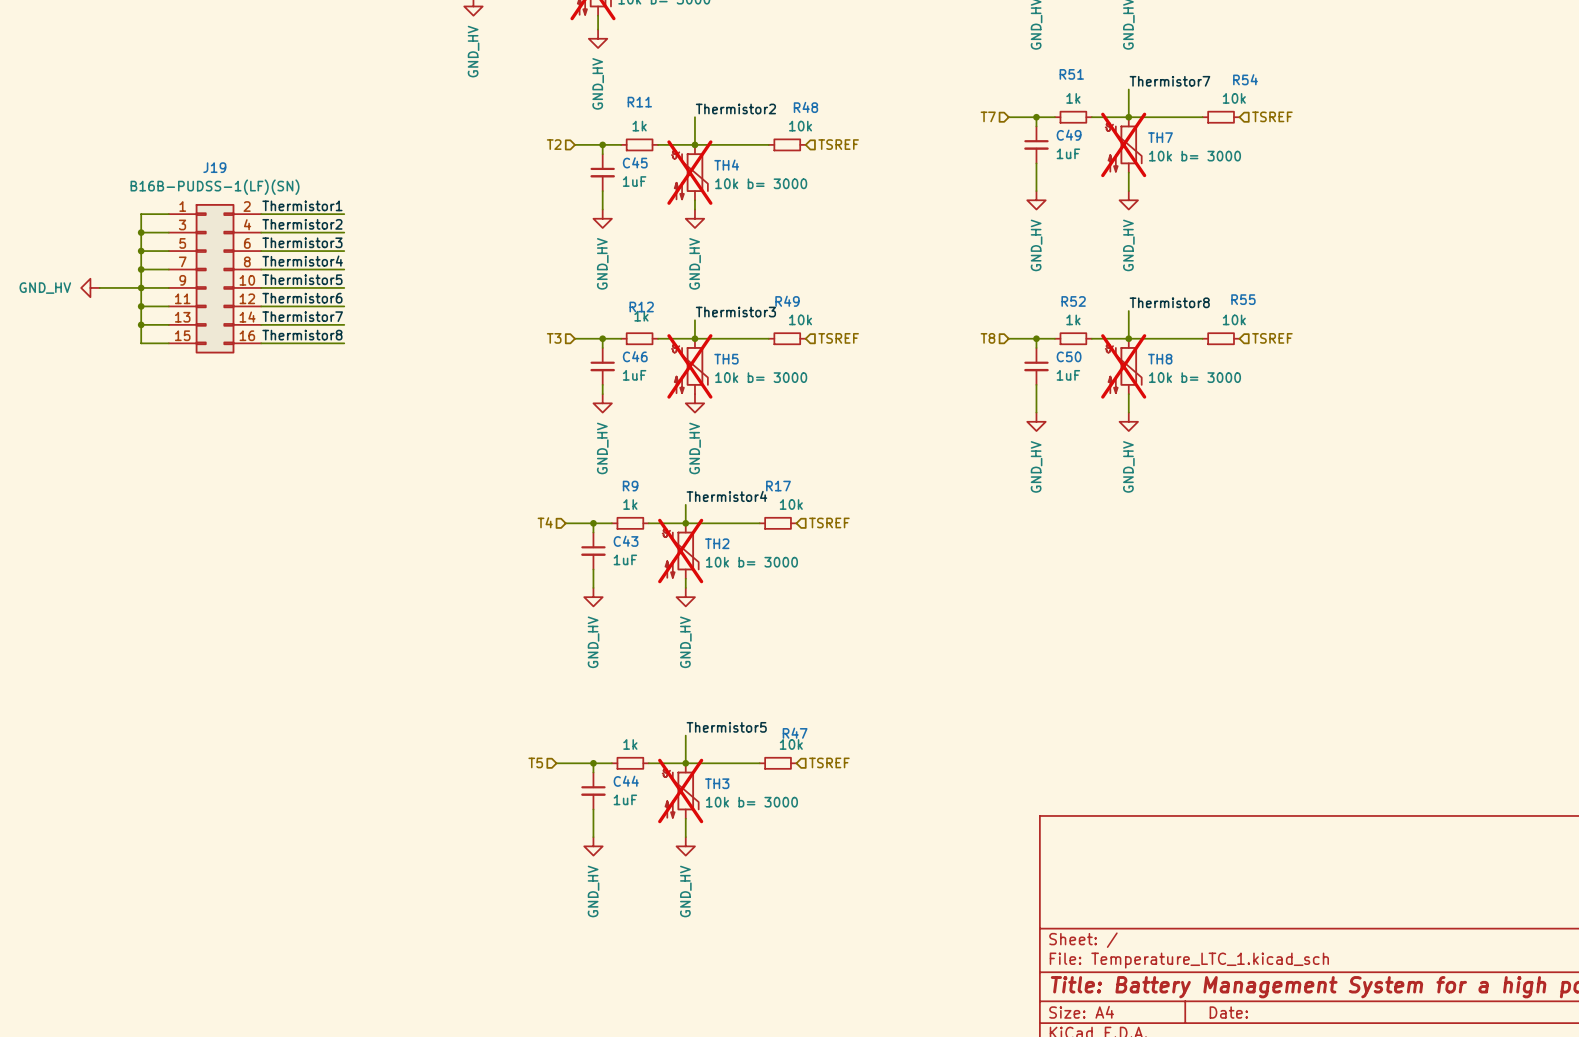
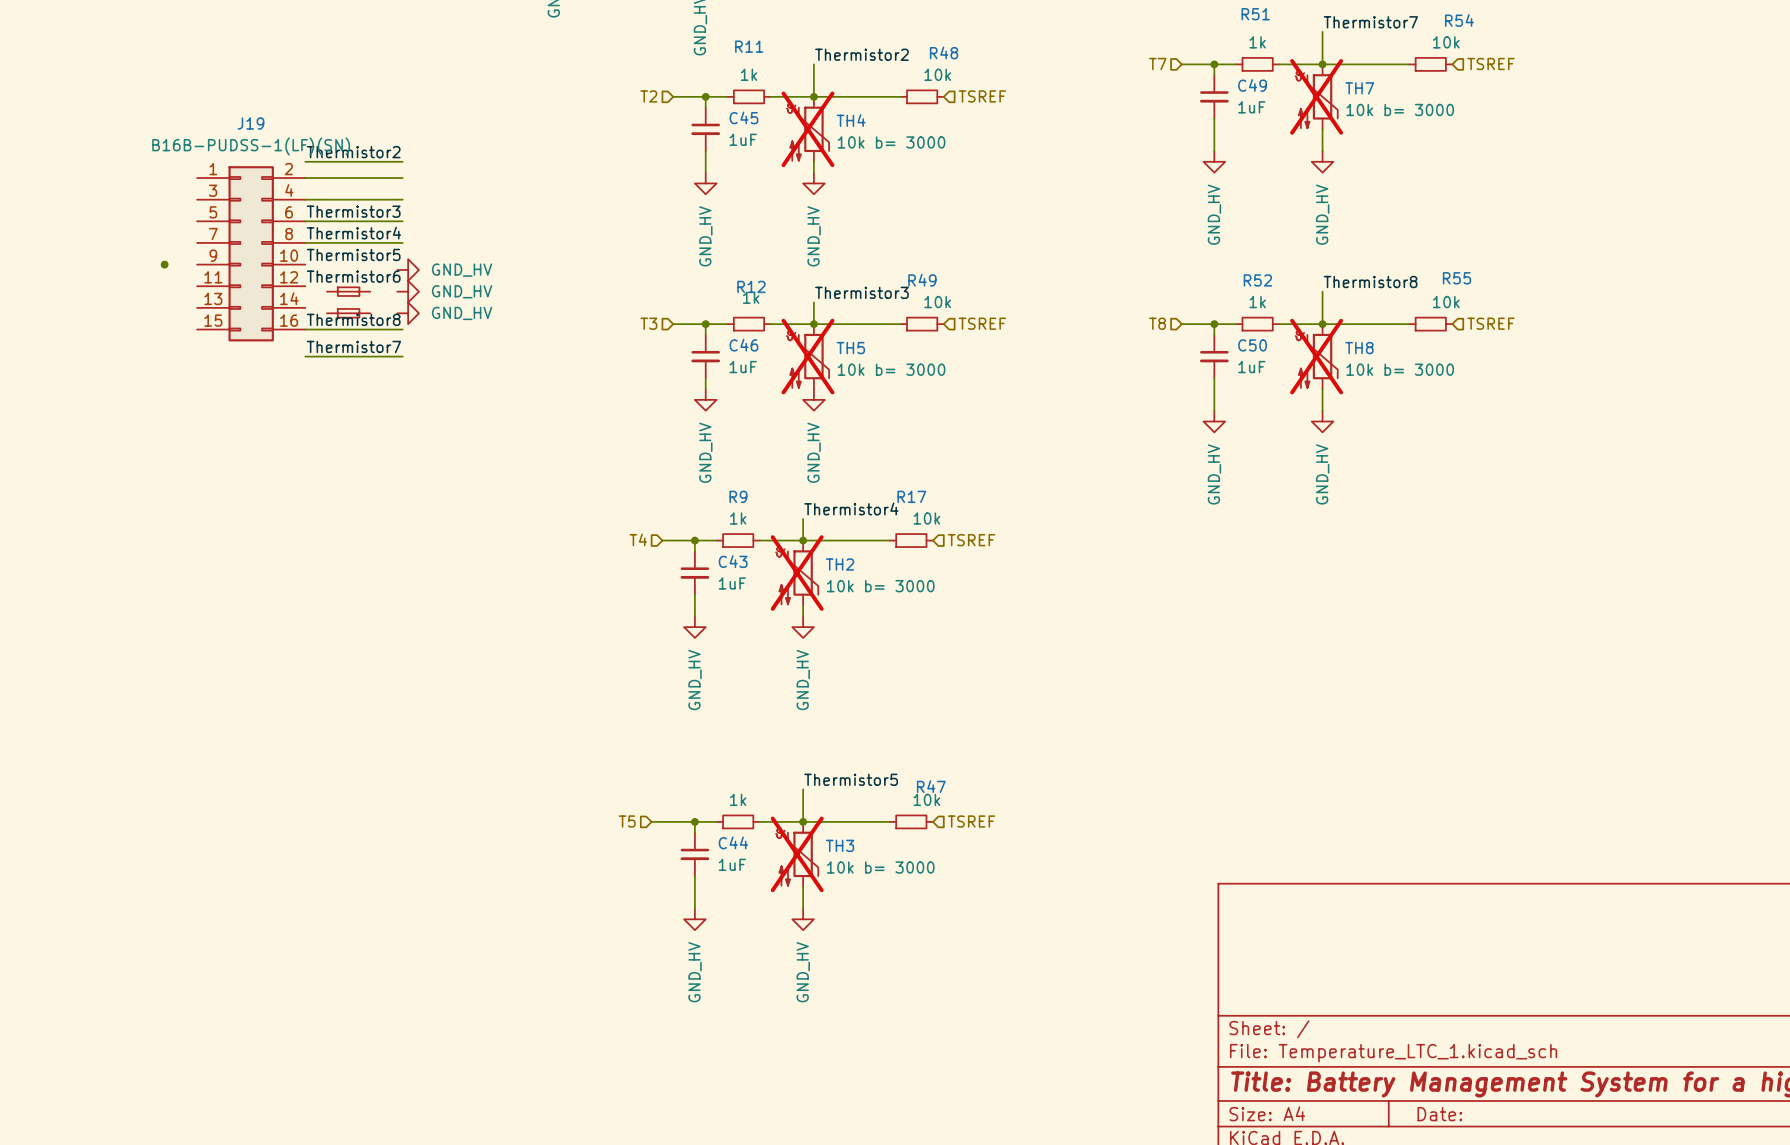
label: Thermistor1 (302, 205) -> none
wire: (168, 214) (141, 214) (141, 343) (168, 343) -> none
label position: Thermistor2 (302, 224) -> Thermistor2 (353, 152)
wire: (141, 232) (168, 232) -> none
junction: (141, 232) -> none
wire: (141, 251) (168, 251) -> none
junction: (141, 251) -> none
wire: (141, 269) (168, 269) -> none
junction: (141, 269) -> none
power symbol: GND_HV (90, 287) -> none
wire: (99, 287) (168, 287) -> none
wire: (261, 287) (344, 287) -> (305, 161) (402, 161)
power symbol: none -> GND_HV (408, 270)
wire: (141, 306) (168, 306) -> none
junction: (141, 306) -> none
wire: (261, 306) (344, 306) -> none
part: none -> (348, 291)
power symbol: none -> GND_HV (408, 291)
label position: Thermistor7 (302, 316) -> Thermistor7 (353, 346)
wire: (141, 324) (168, 324) -> none
junction: (141, 324) -> none
wire: (261, 324) (344, 324) -> (305, 356) (402, 356)
part: none -> (348, 313)
power symbol: none -> GND_HV (408, 313)

